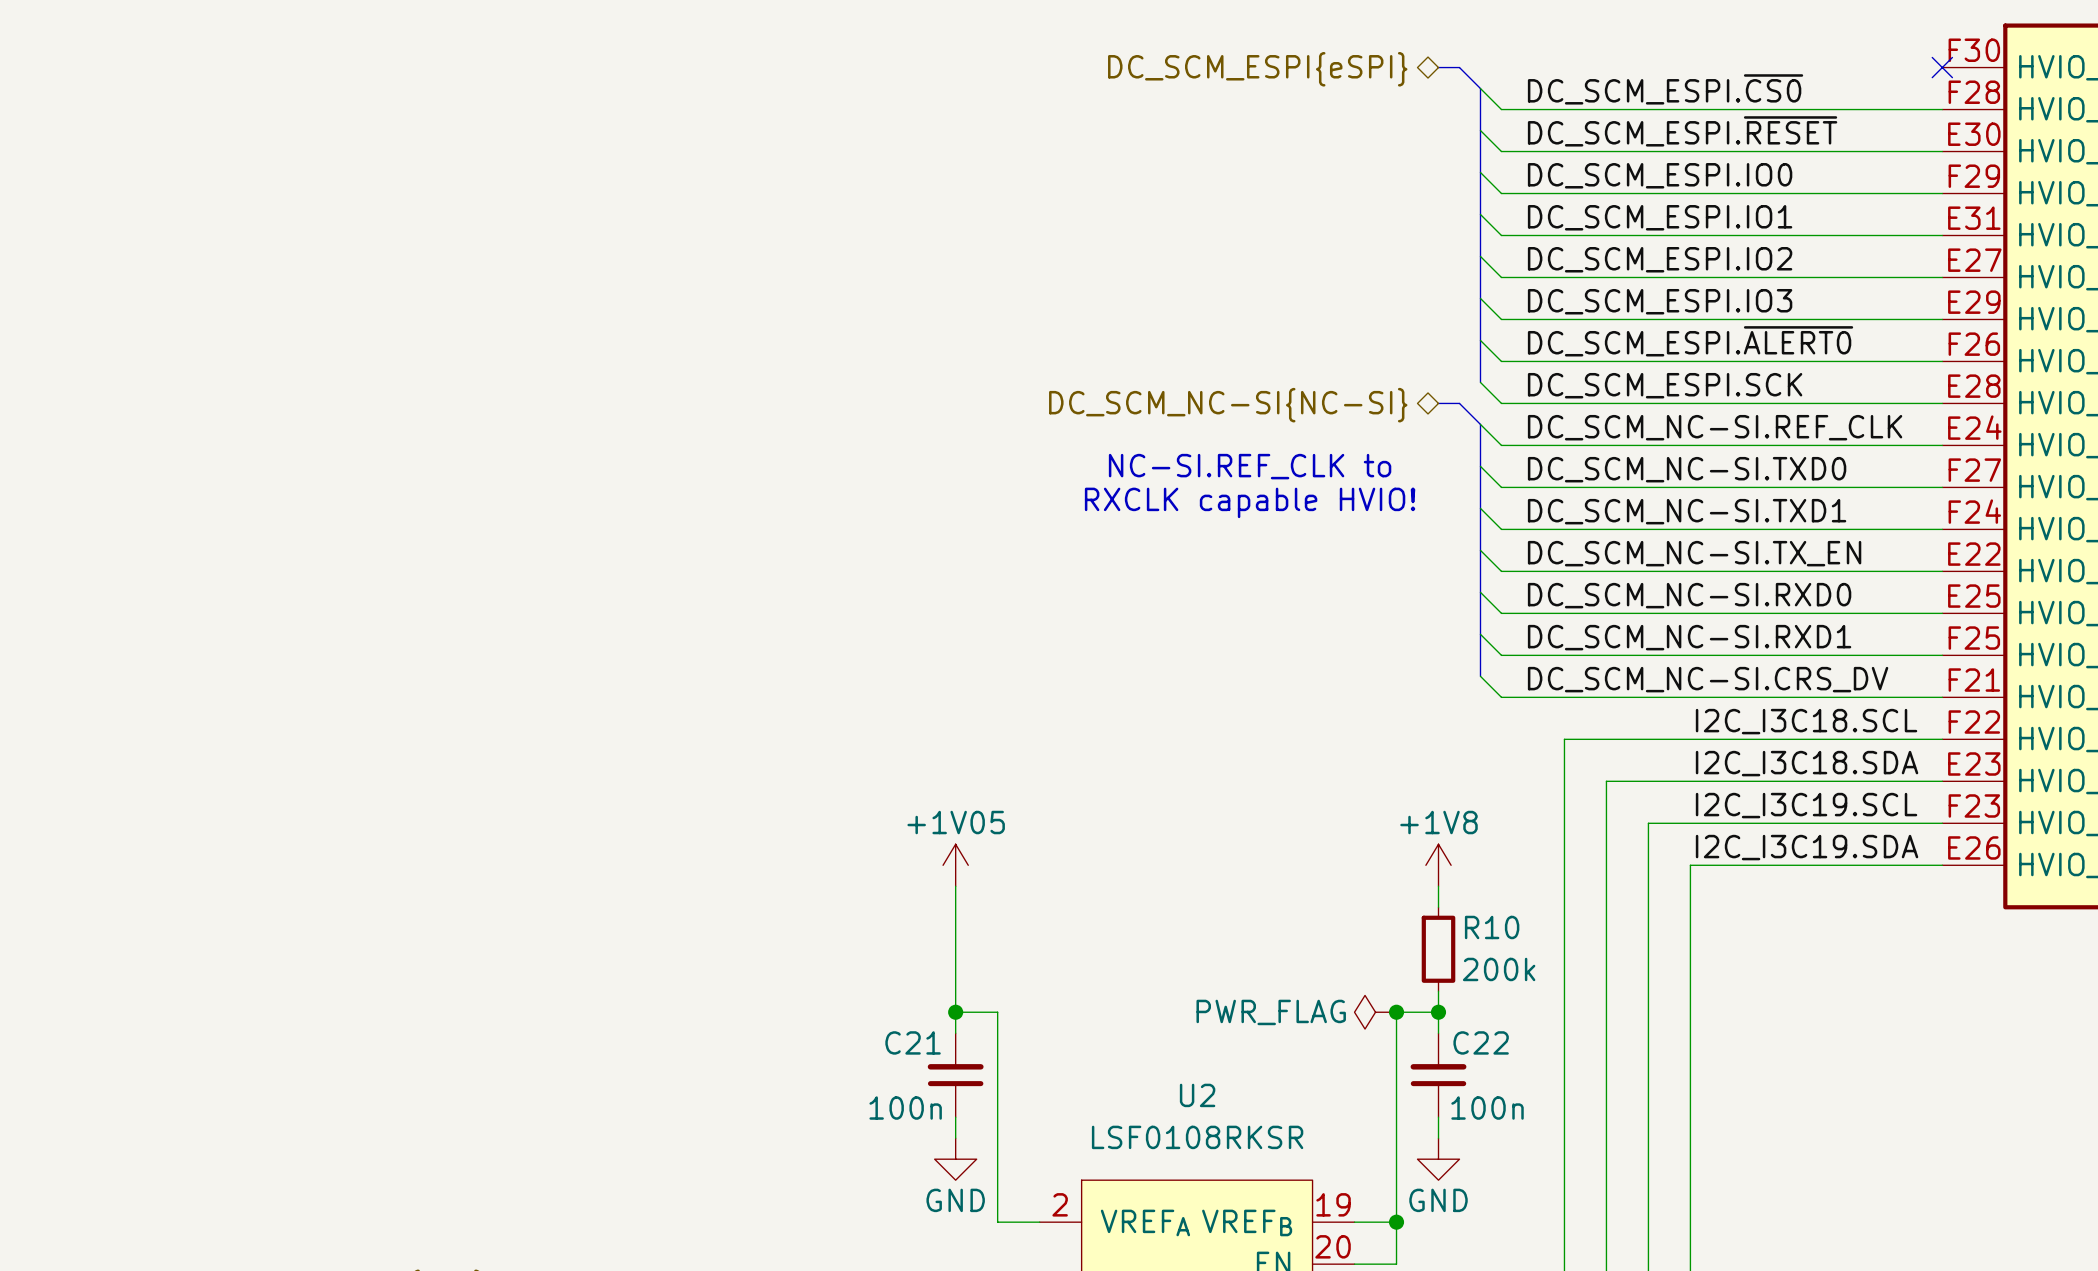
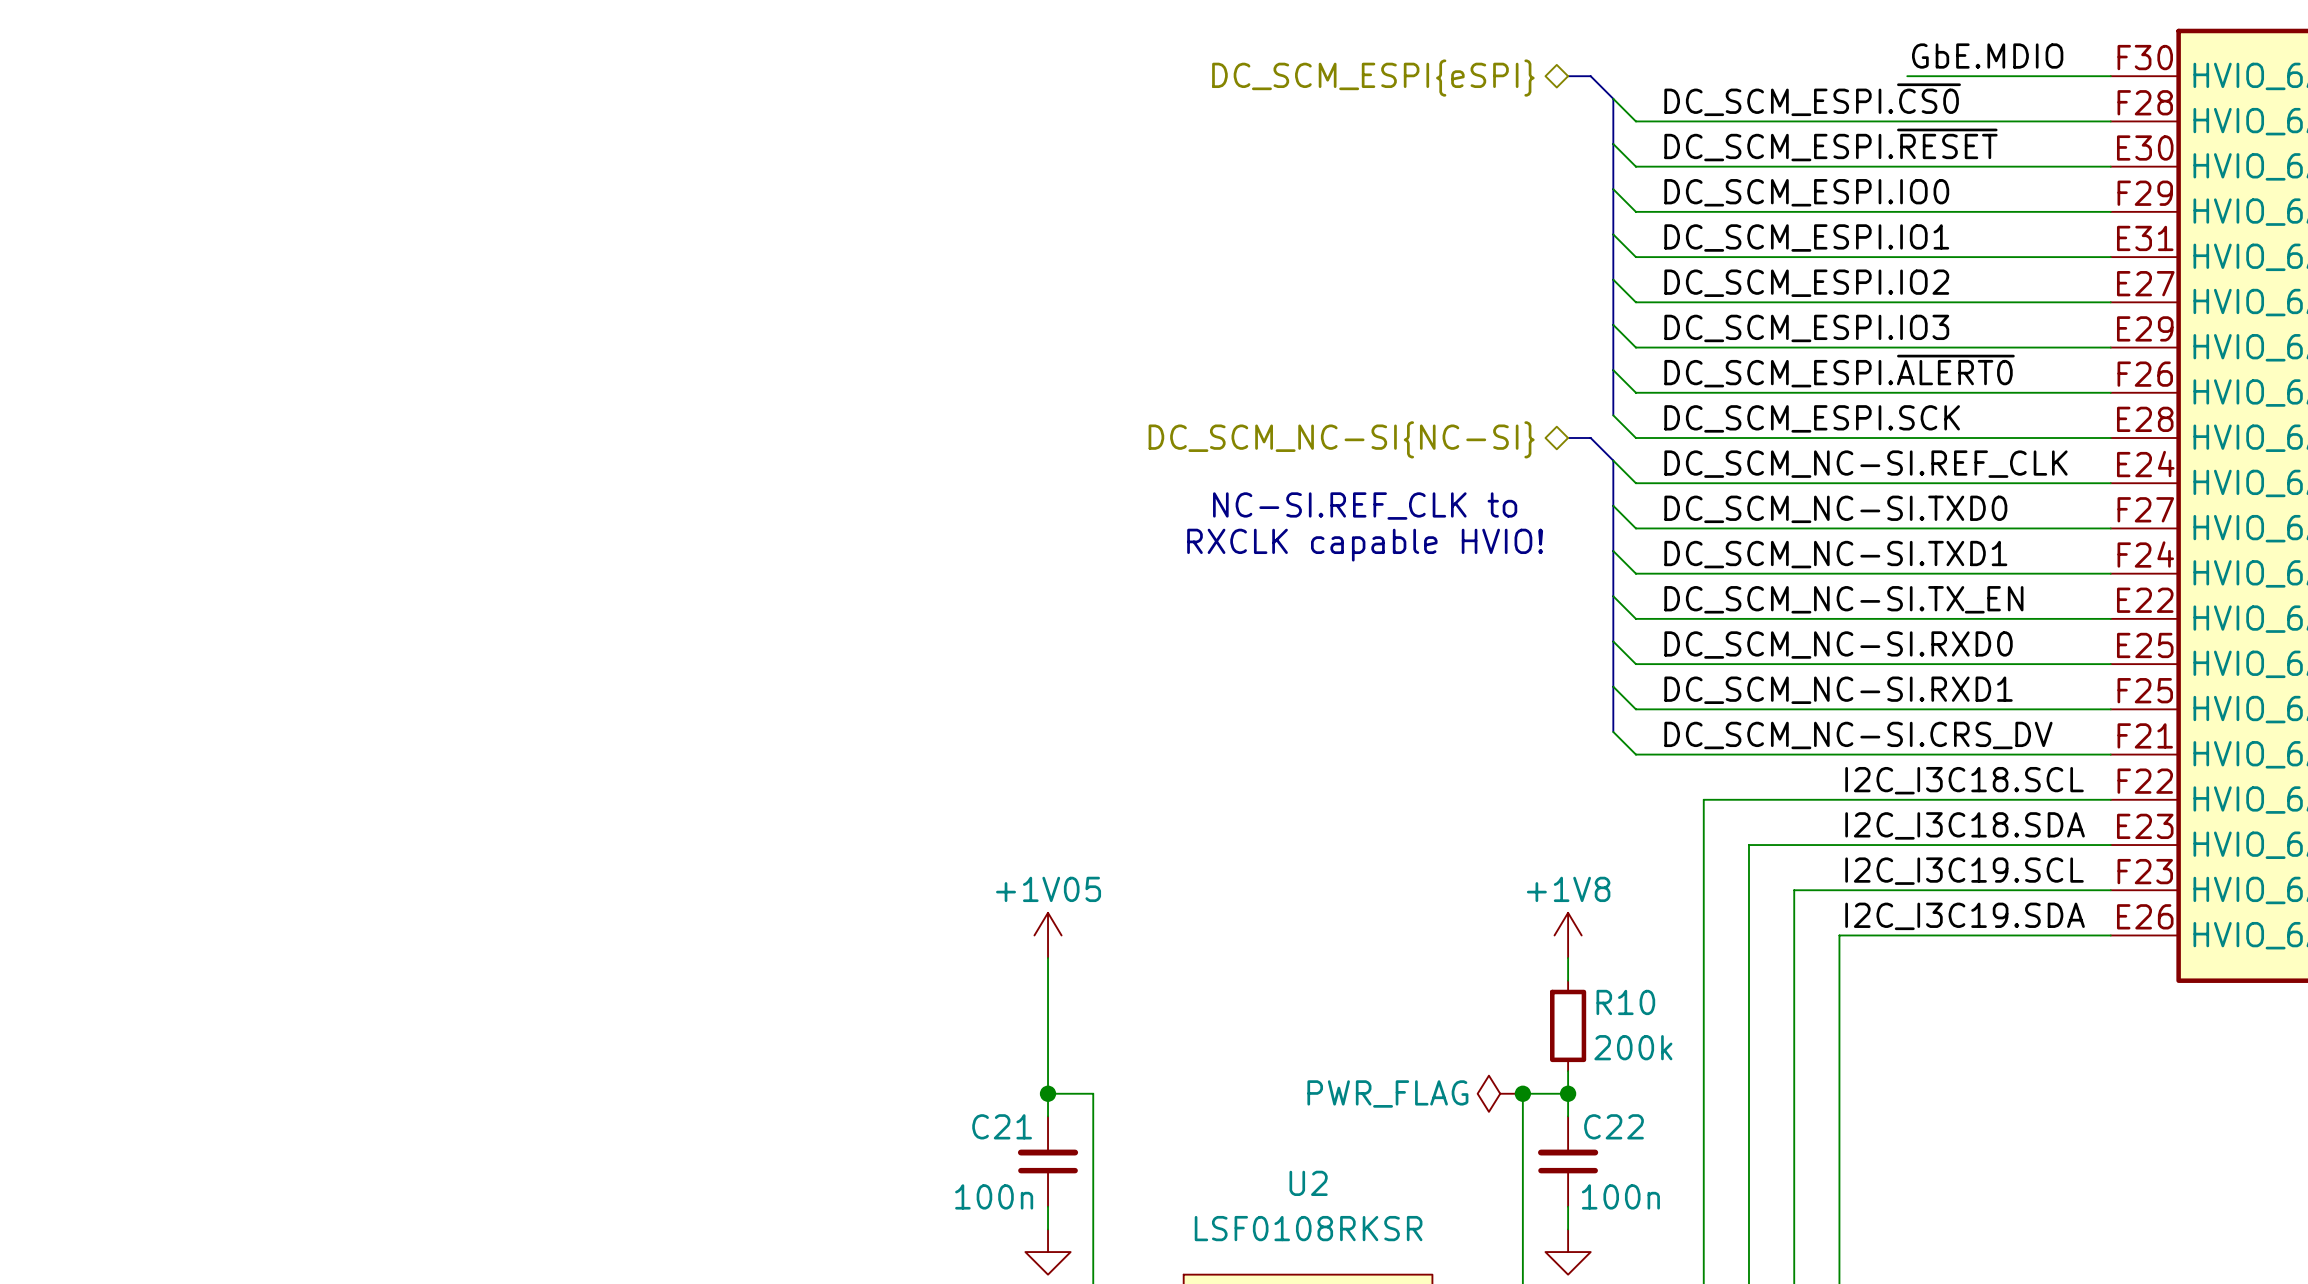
label: none -> GbE.MDIO (1987, 56)
wire: none -> (1907, 76) (2110, 76)
no-connect mark: (1942, 67) -> none

